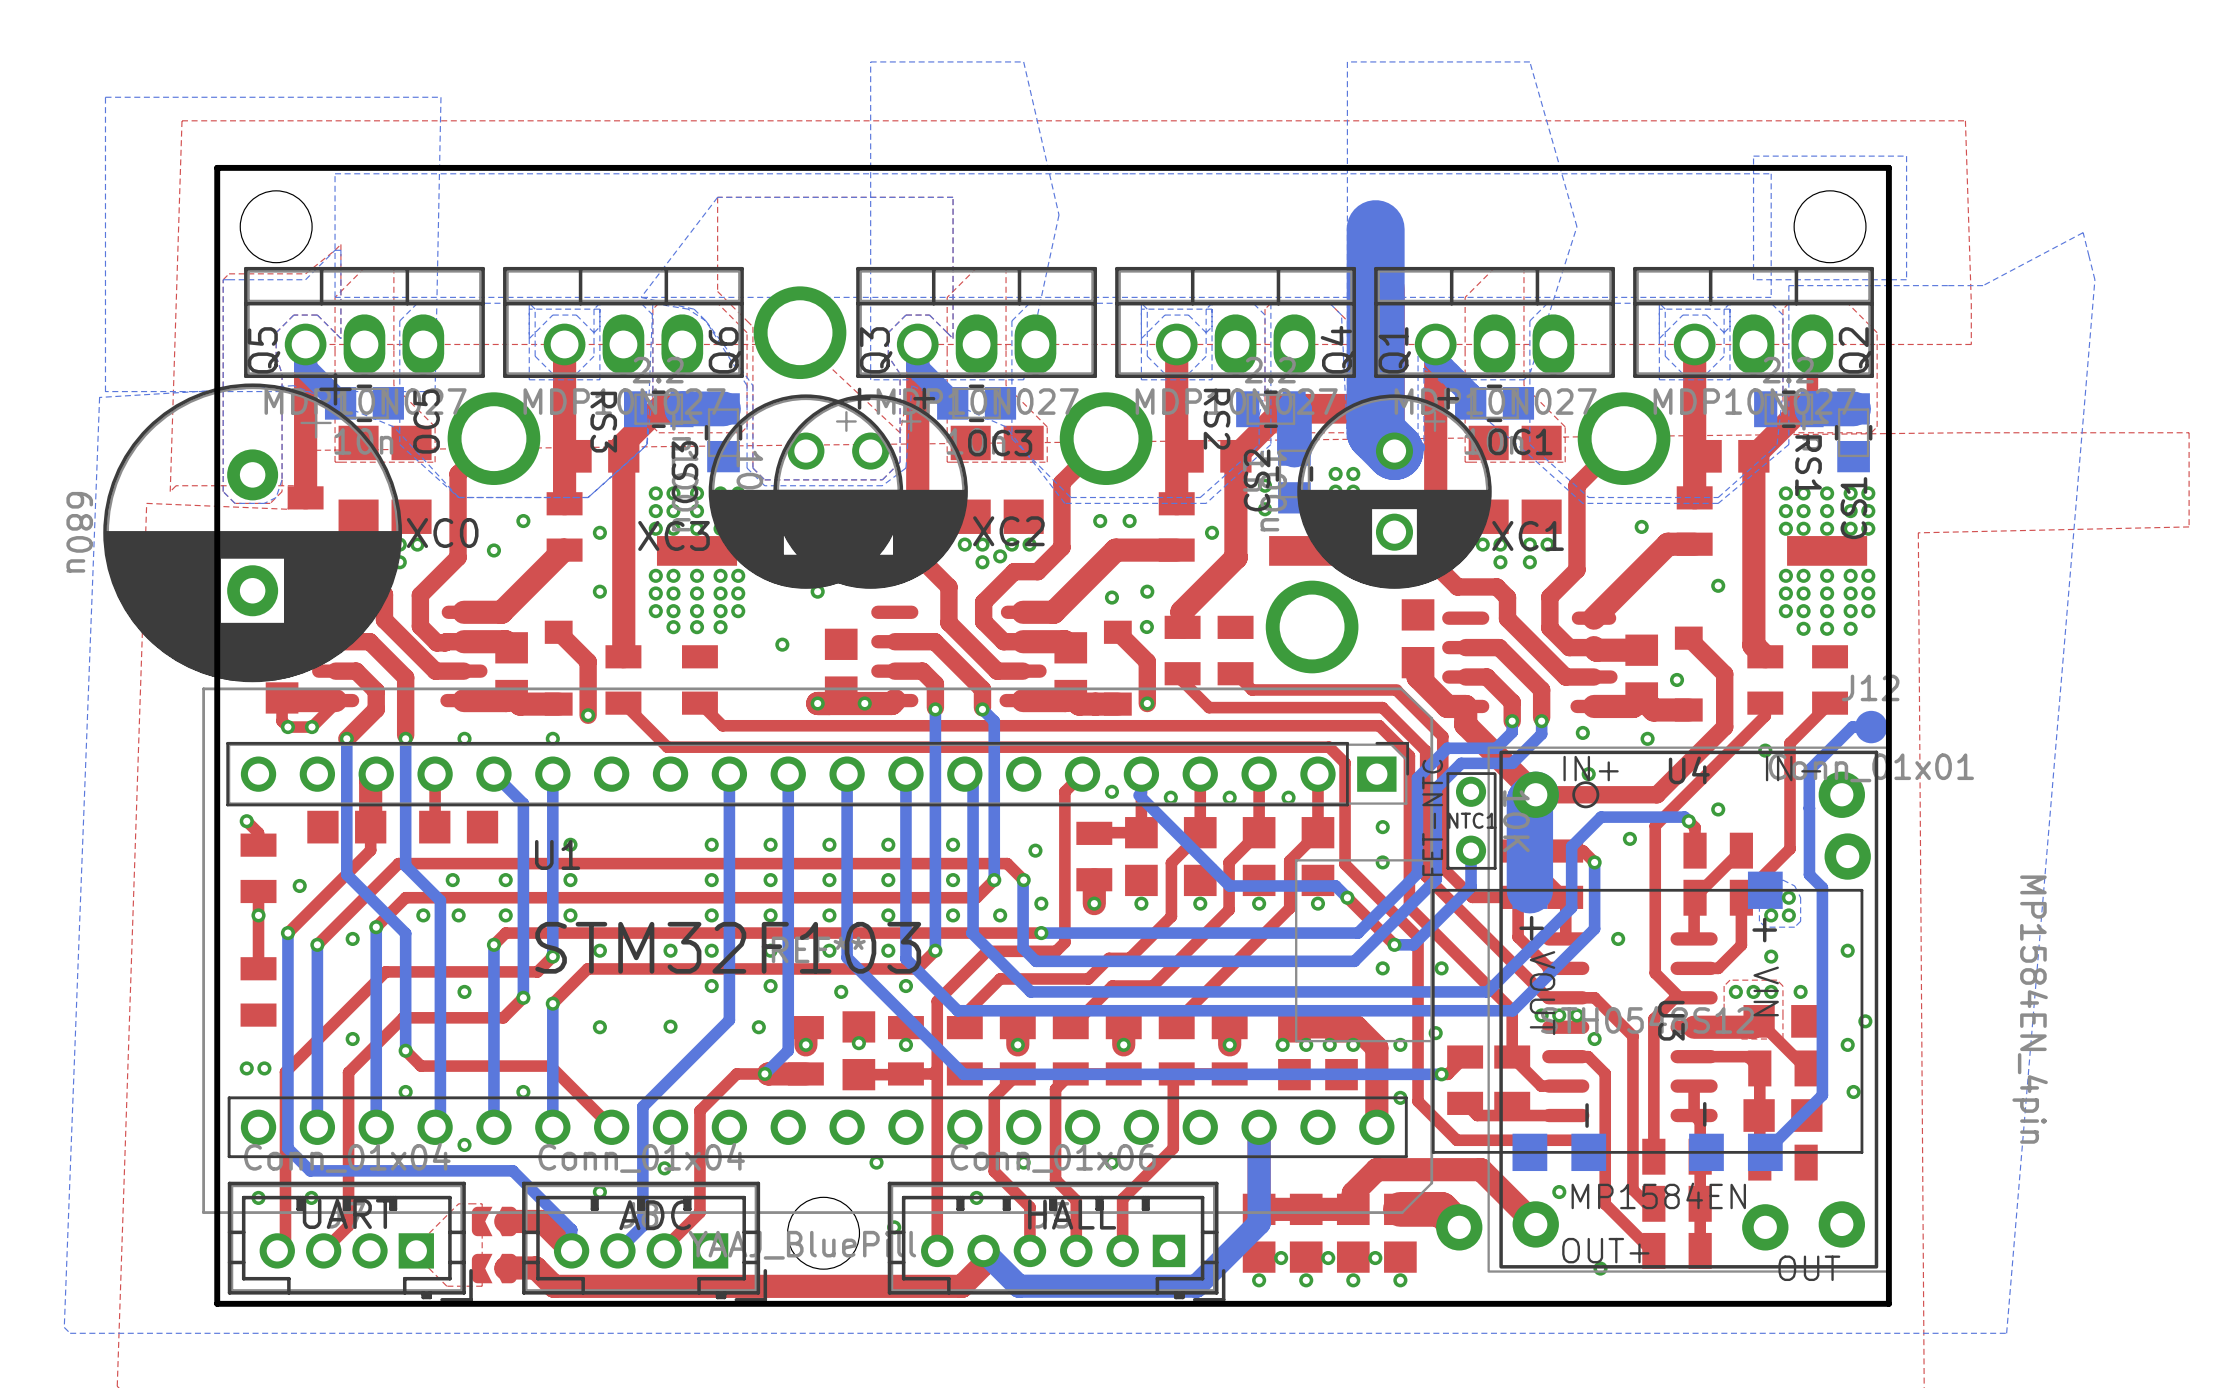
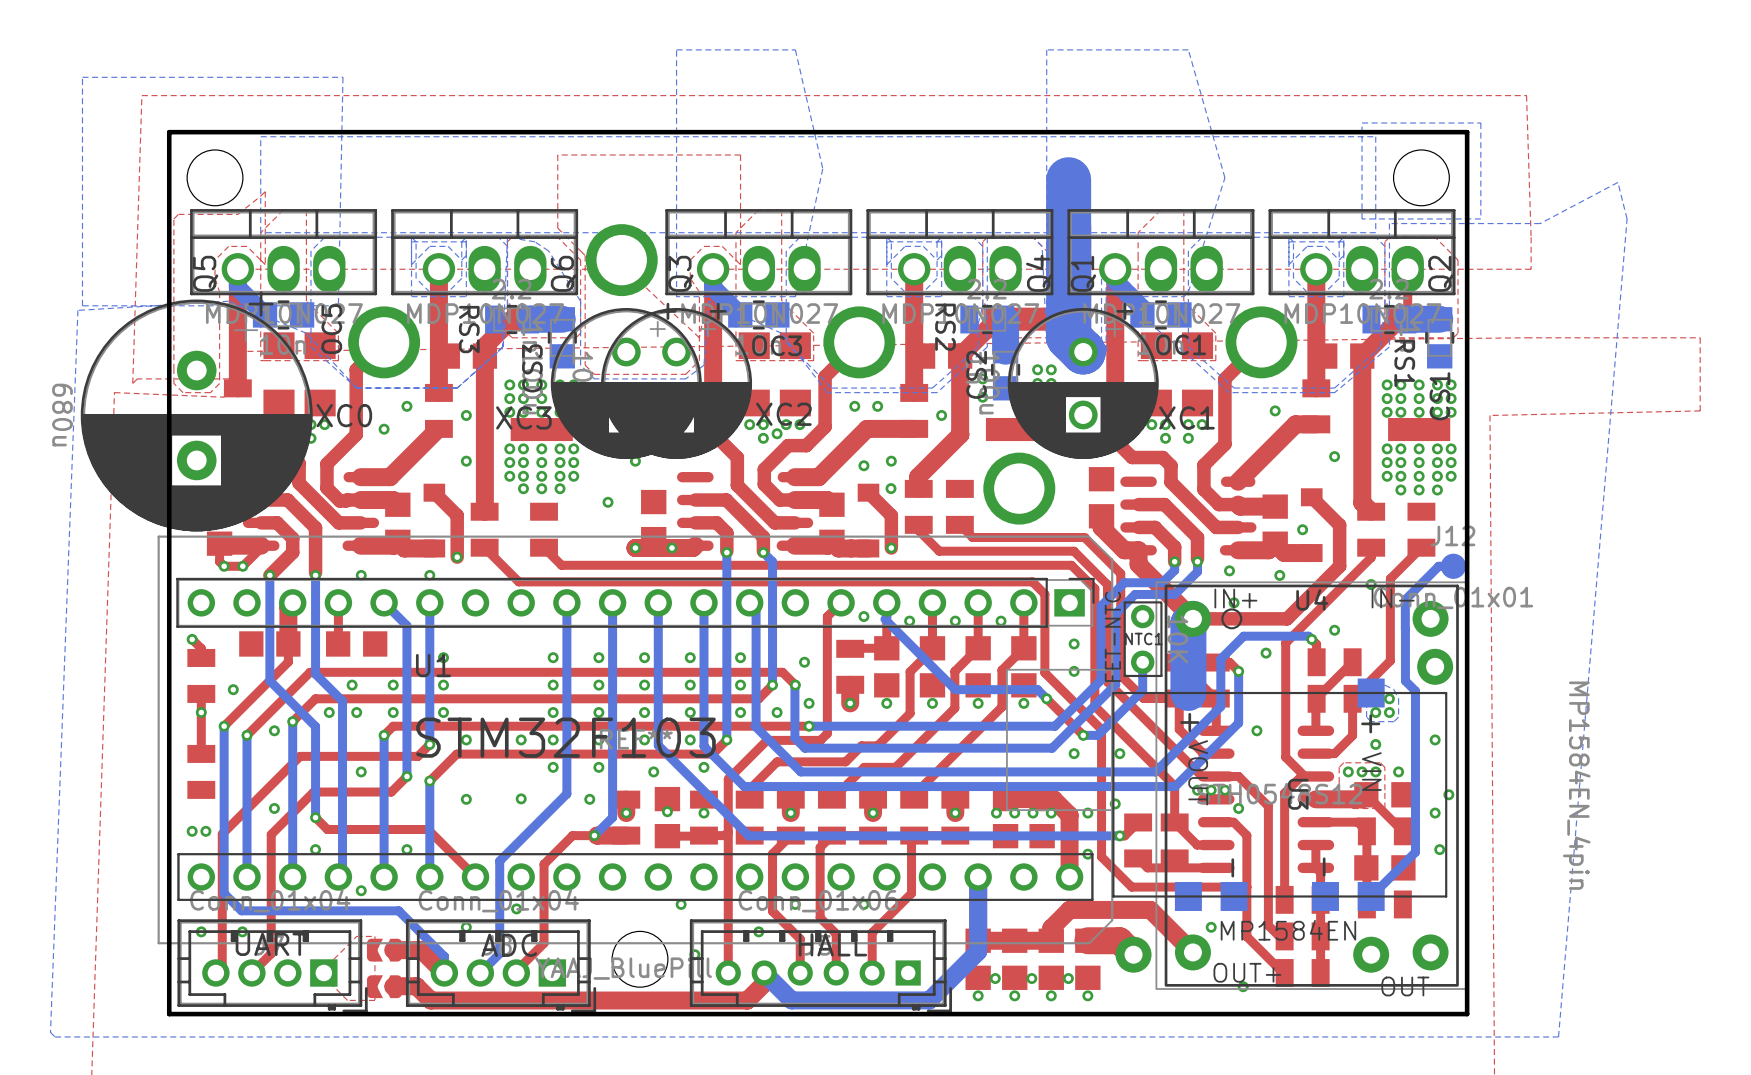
bottom zone outline: (953, 197) (953, 338) (929, 315) (905, 315) (888, 332) (888, 356) (900, 373) (900, 462) (882, 479) (764, 479) (752, 468) (752, 385) (705, 320) (694, 309) (641, 297) (717, 197) (953, 197) -> none
bottom zone outline: (340, 250) (335, 250) (305, 279) (223, 279) (223, 491) (234, 503) (264, 503) (276, 497) (282, 479) (282, 373) (276, 356) (276, 332) (293, 315) (317, 315) (340, 338) (340, 250) -> none

